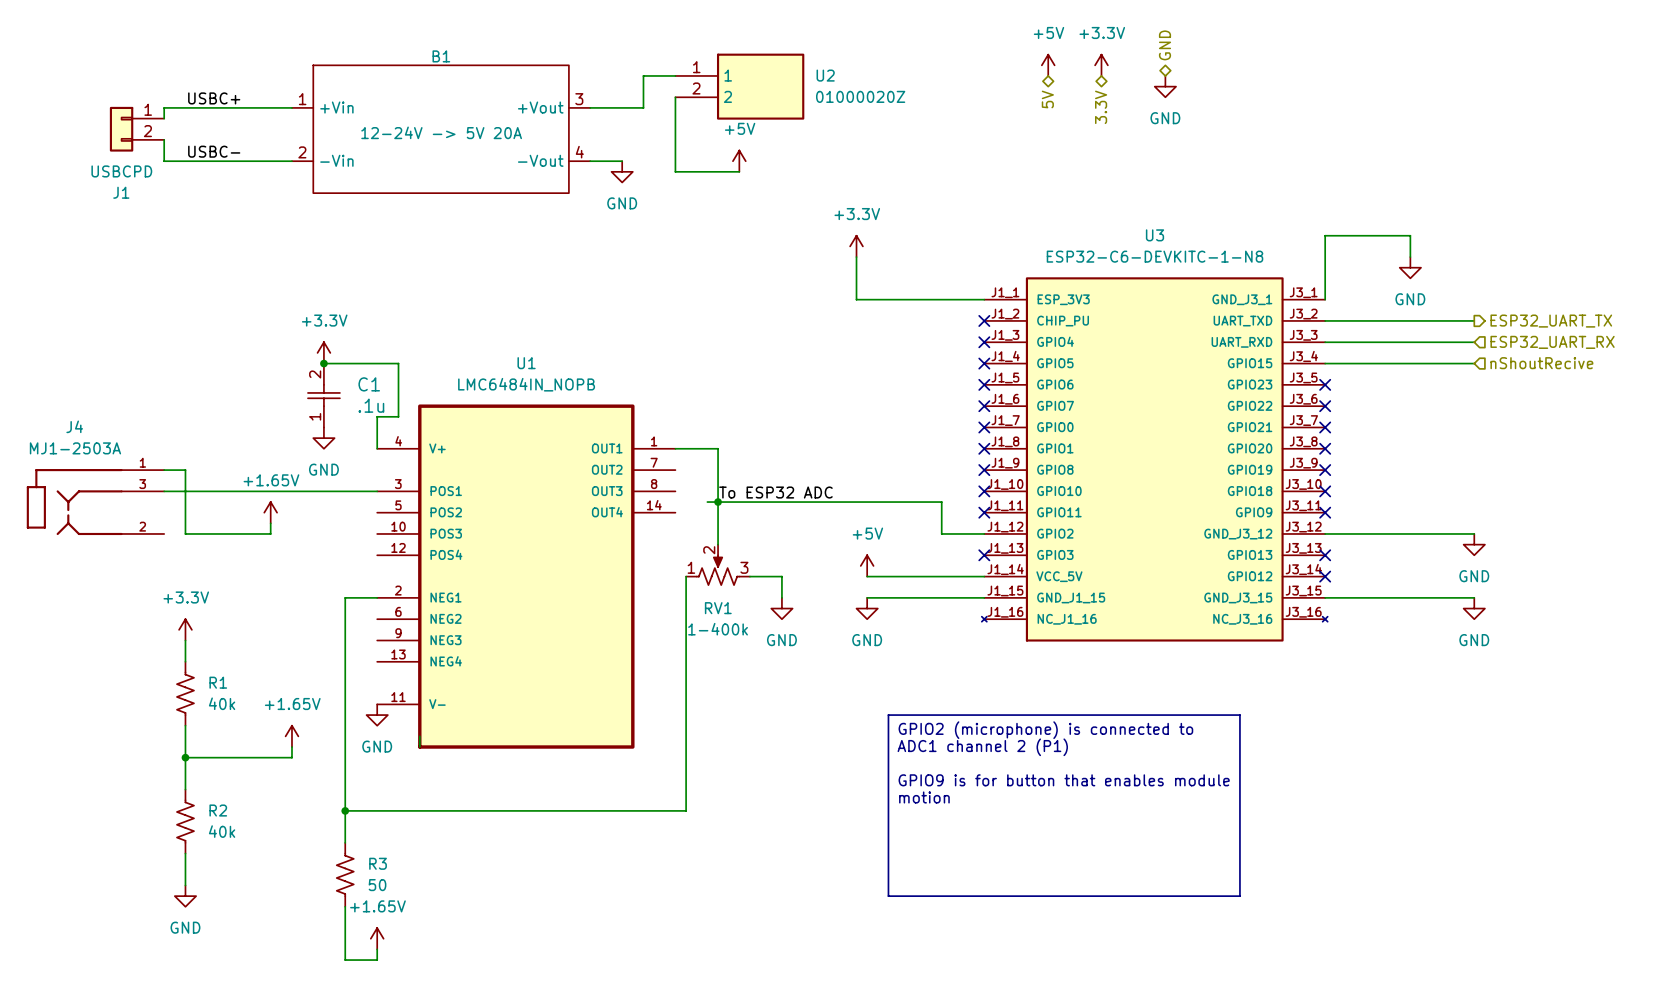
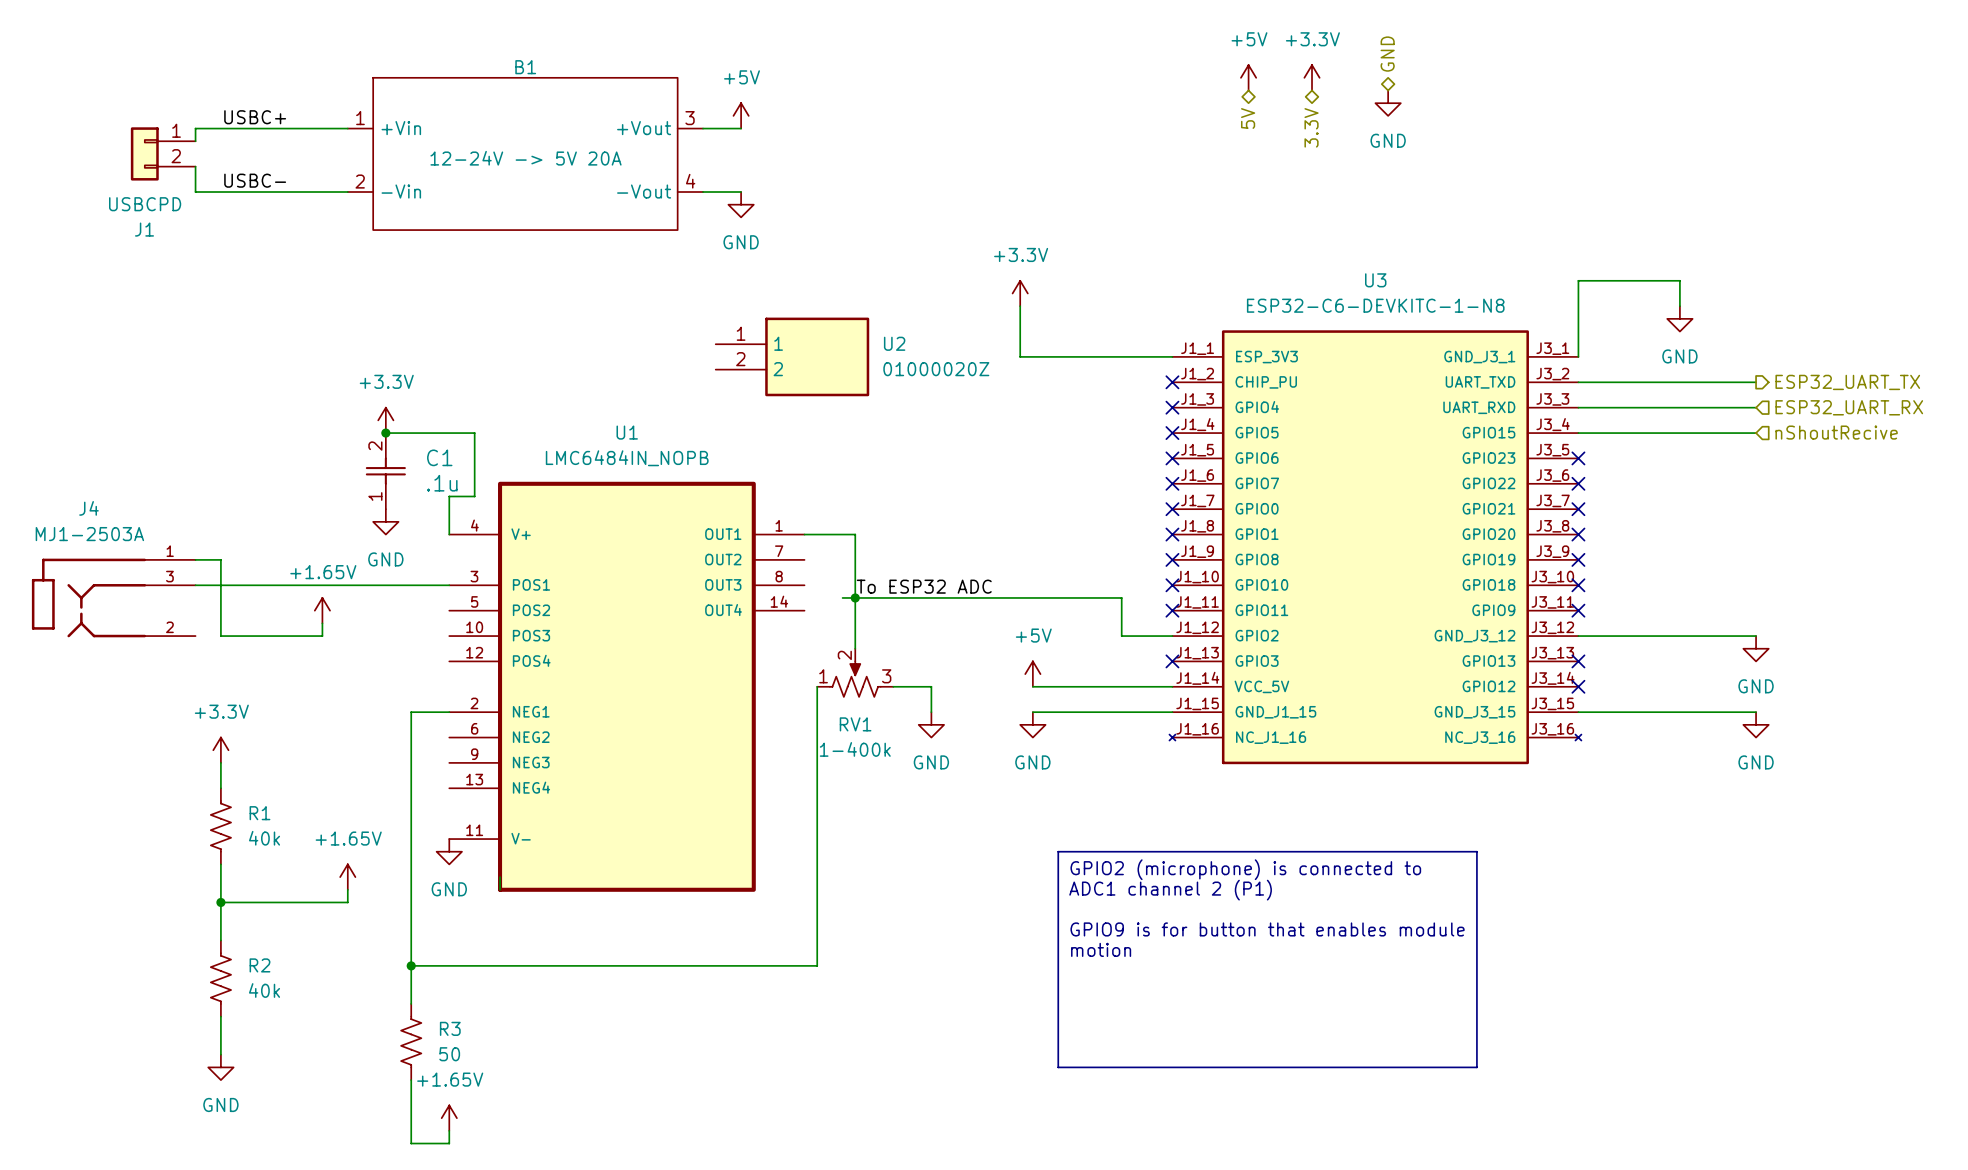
wire: (675, 75) (643, 75) (643, 107) (622, 107) -> none
U2 position: (739, 86) -> (792, 356)
wire: (675, 97) (675, 171) (739, 171) -> none
power symbol position: +5V (739, 161) -> +5V (741, 115)

